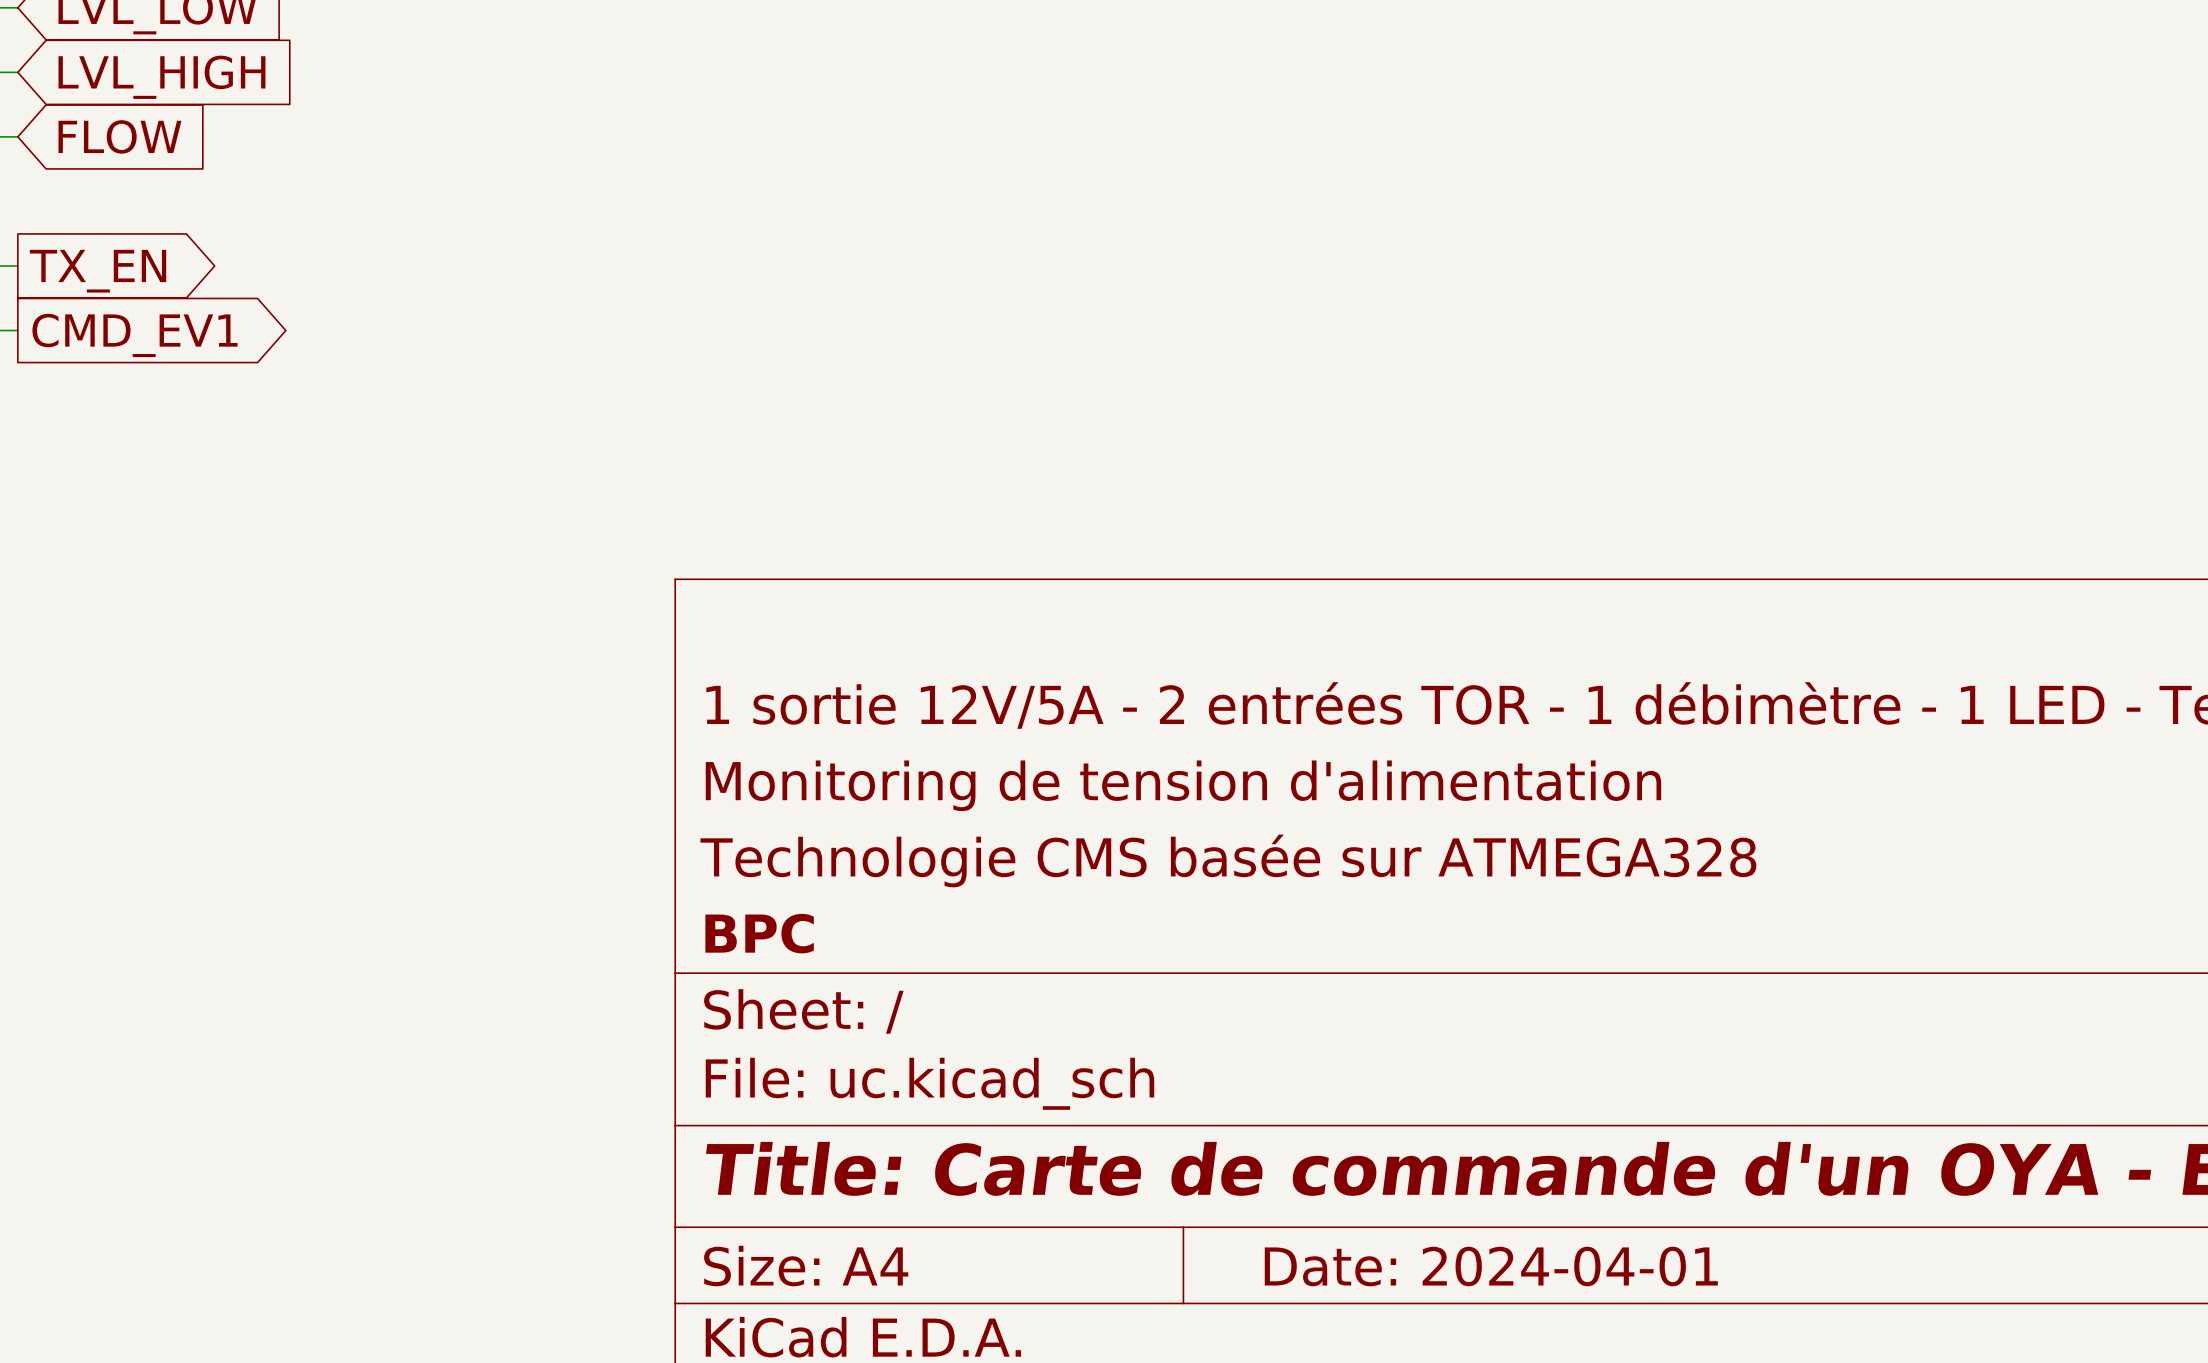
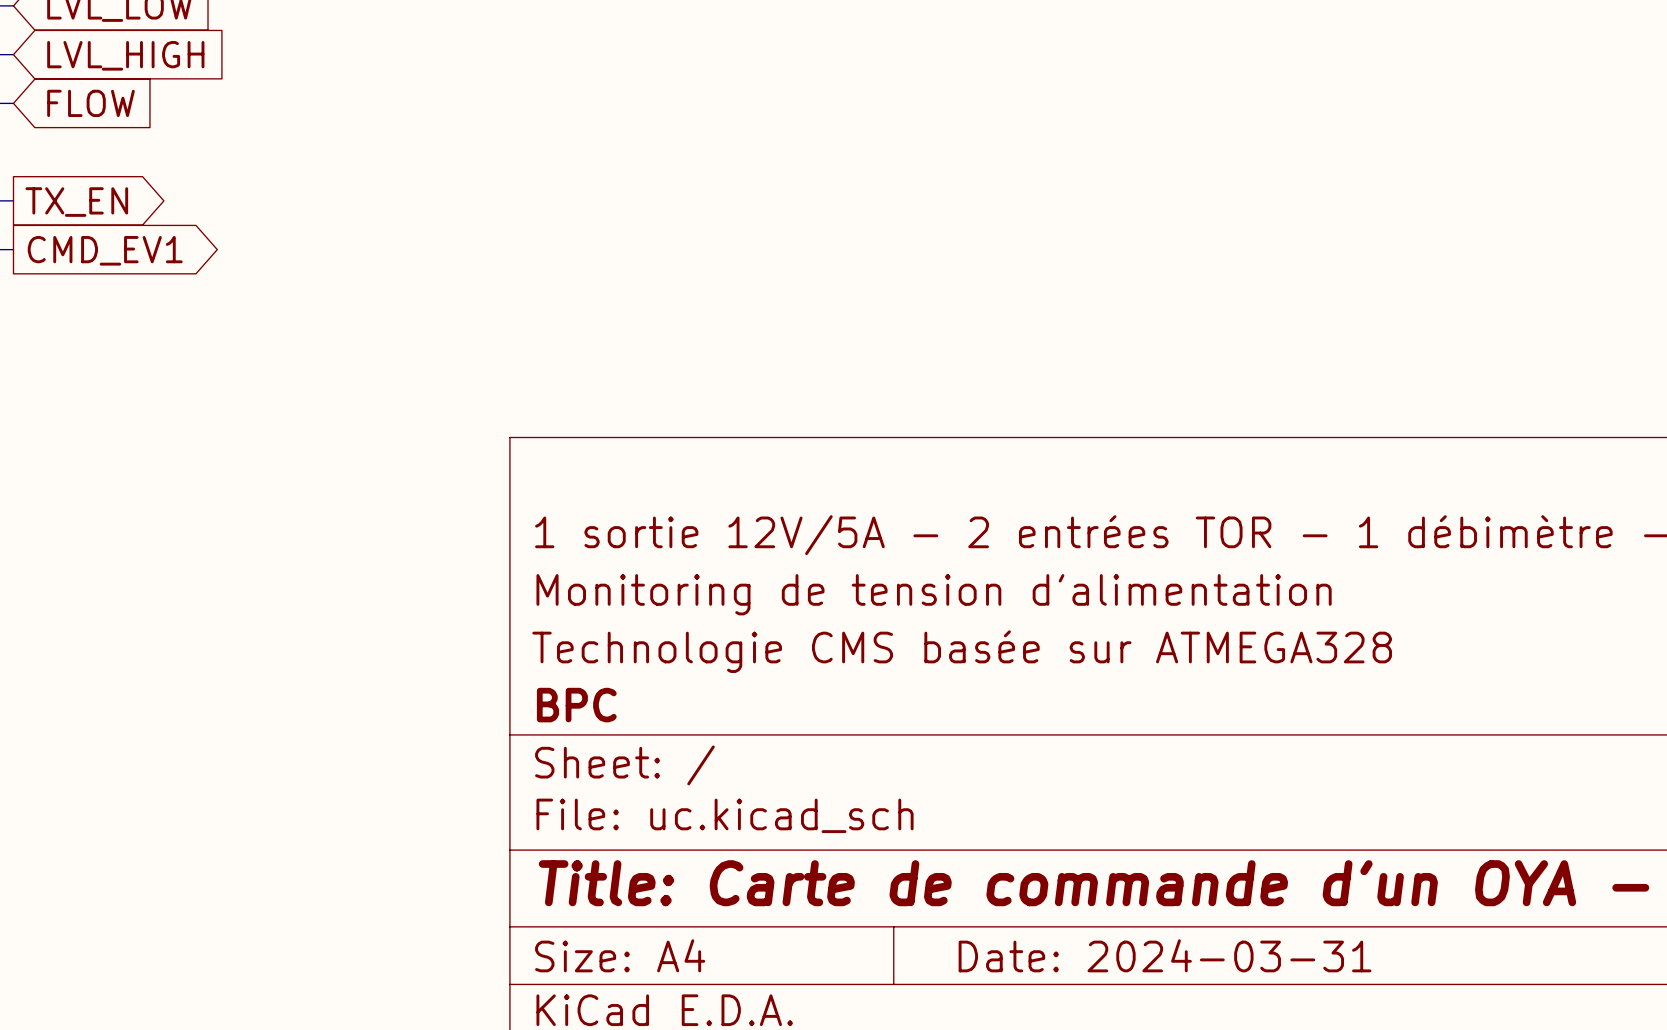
title block: Date: 2024-04-01 (1491, 1266) -> Date: 2024-03-31 (1165, 955)

